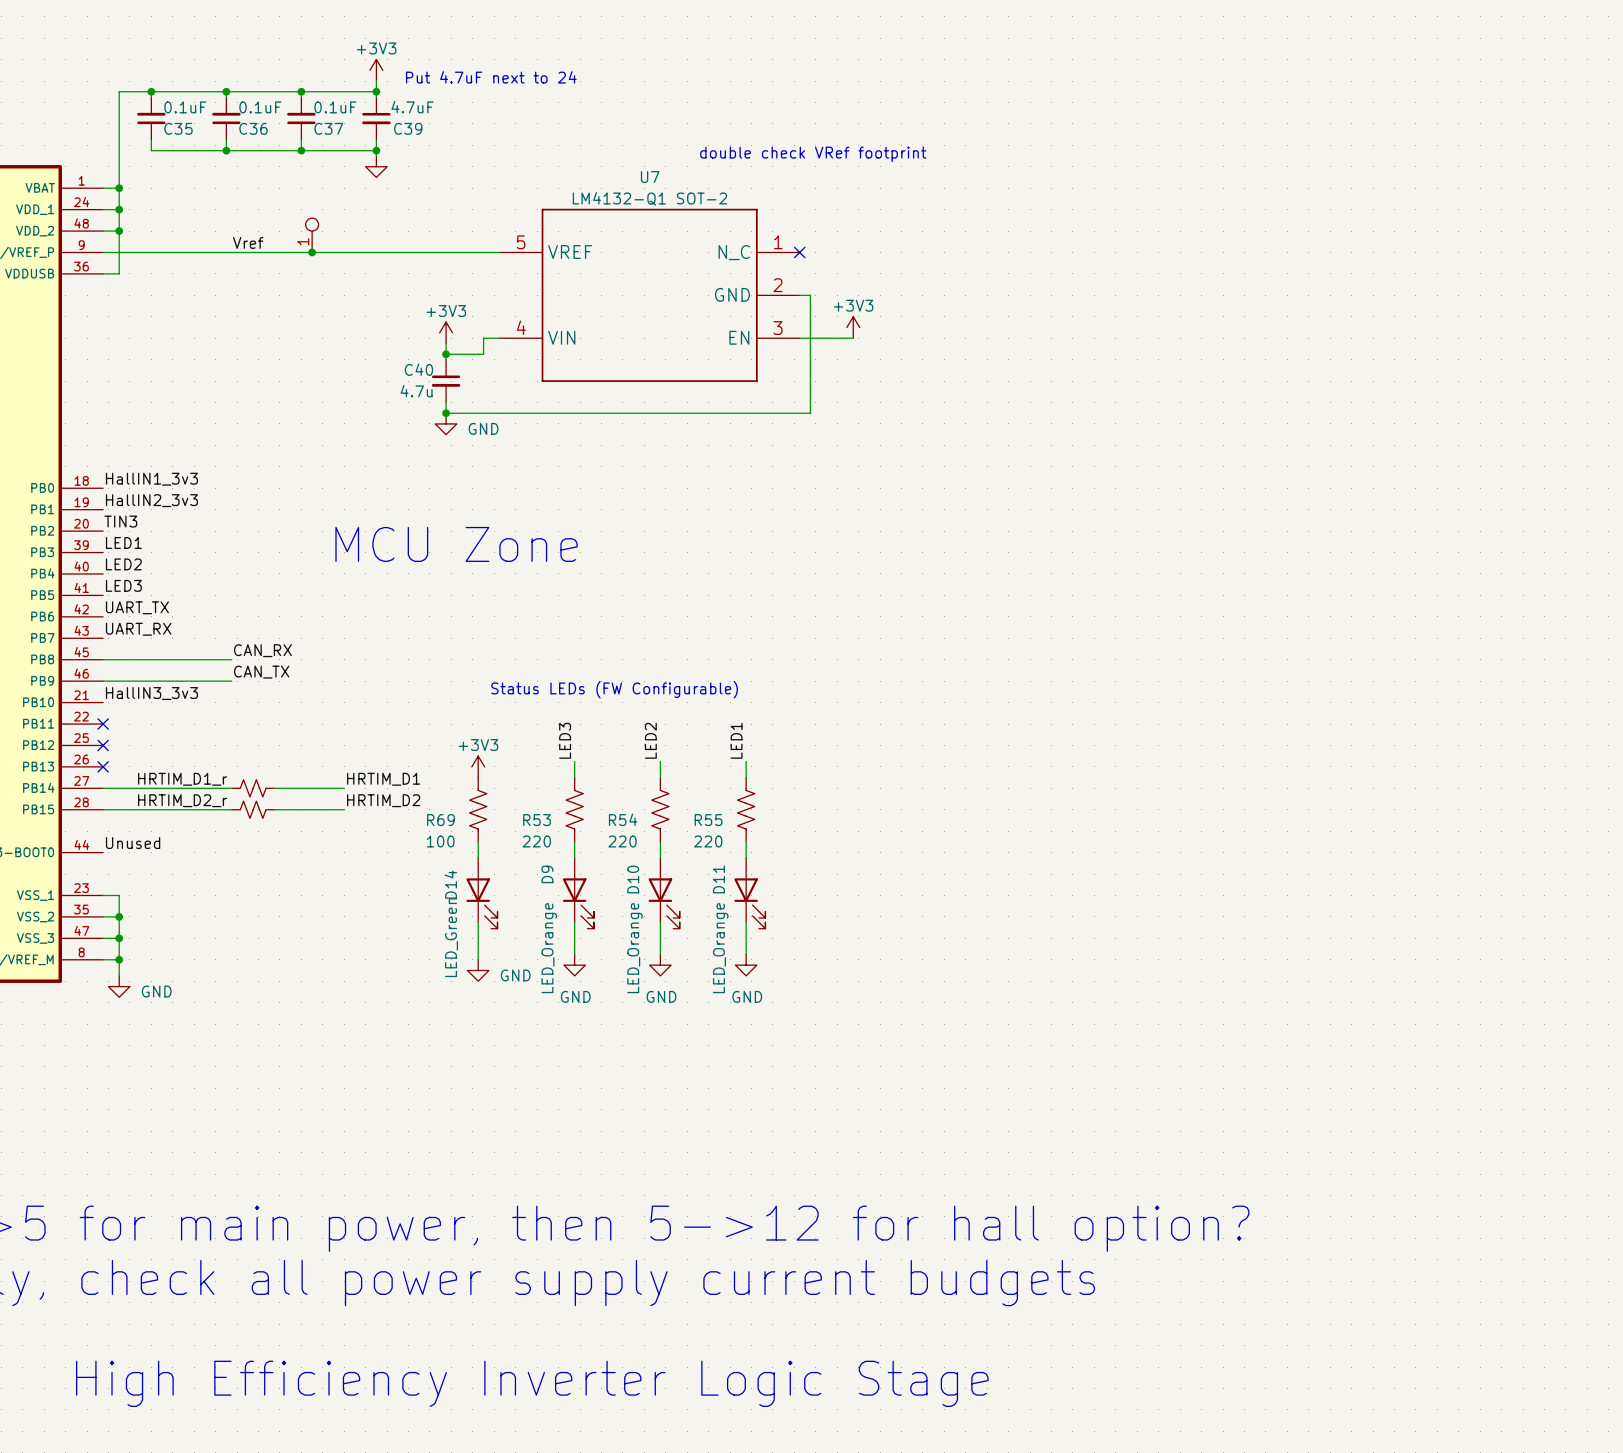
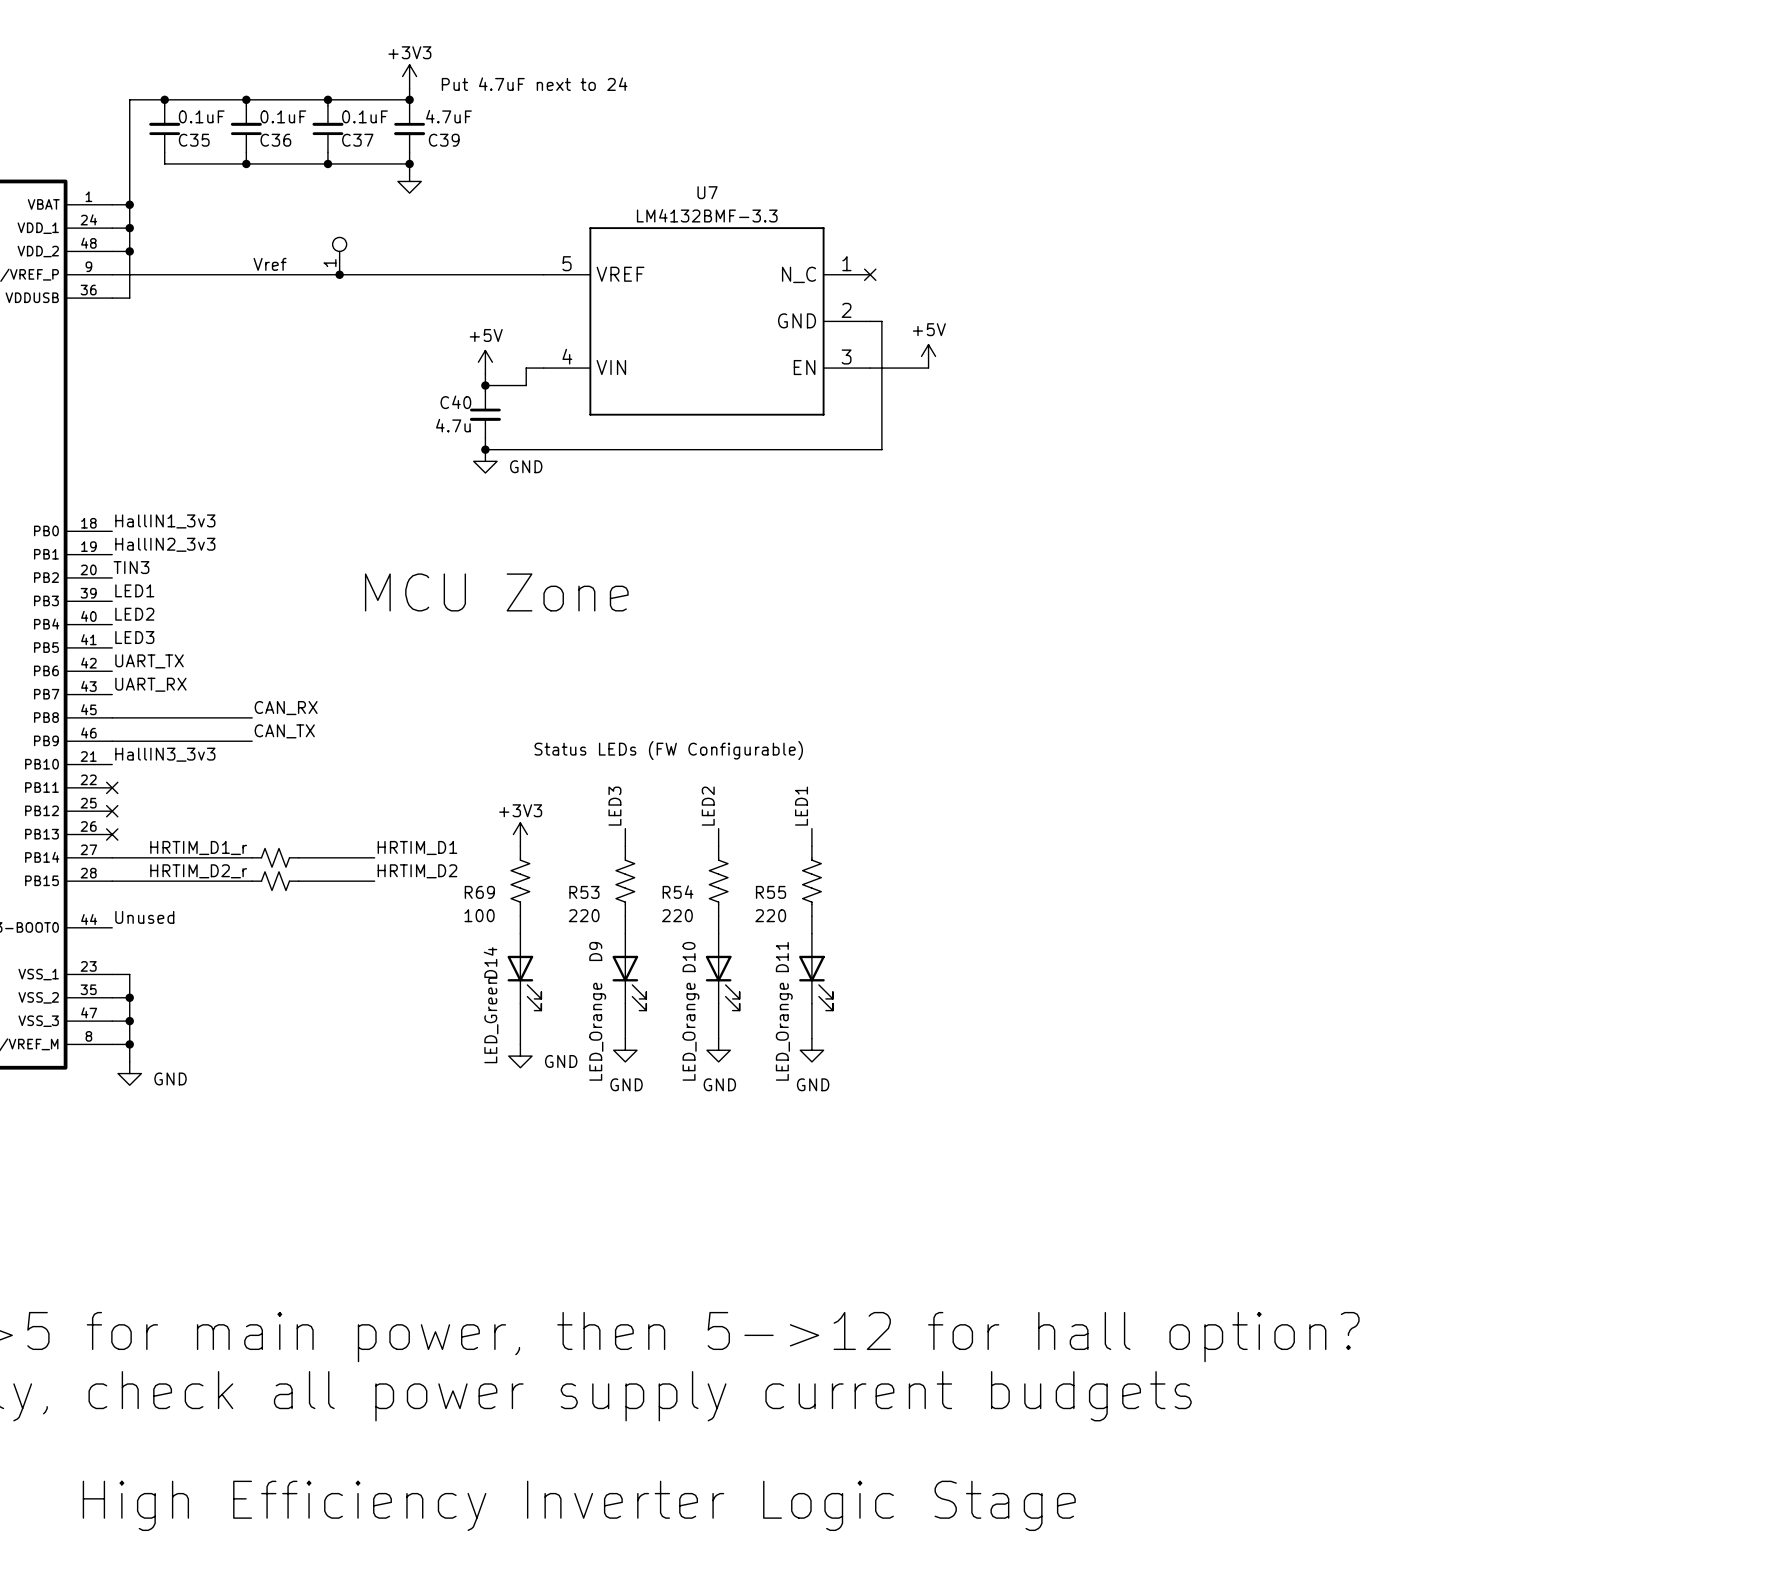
text: double check VRef footprint (813, 154) -> none
U7 value: LM4132-Q1 SOT-2 (649, 198) -> LM4132BMF-3.3 (707, 215)
power symbol: +3V3 (853, 327) -> +5V (928, 356)
power symbol: +3V3 (446, 332) -> +5V (485, 362)

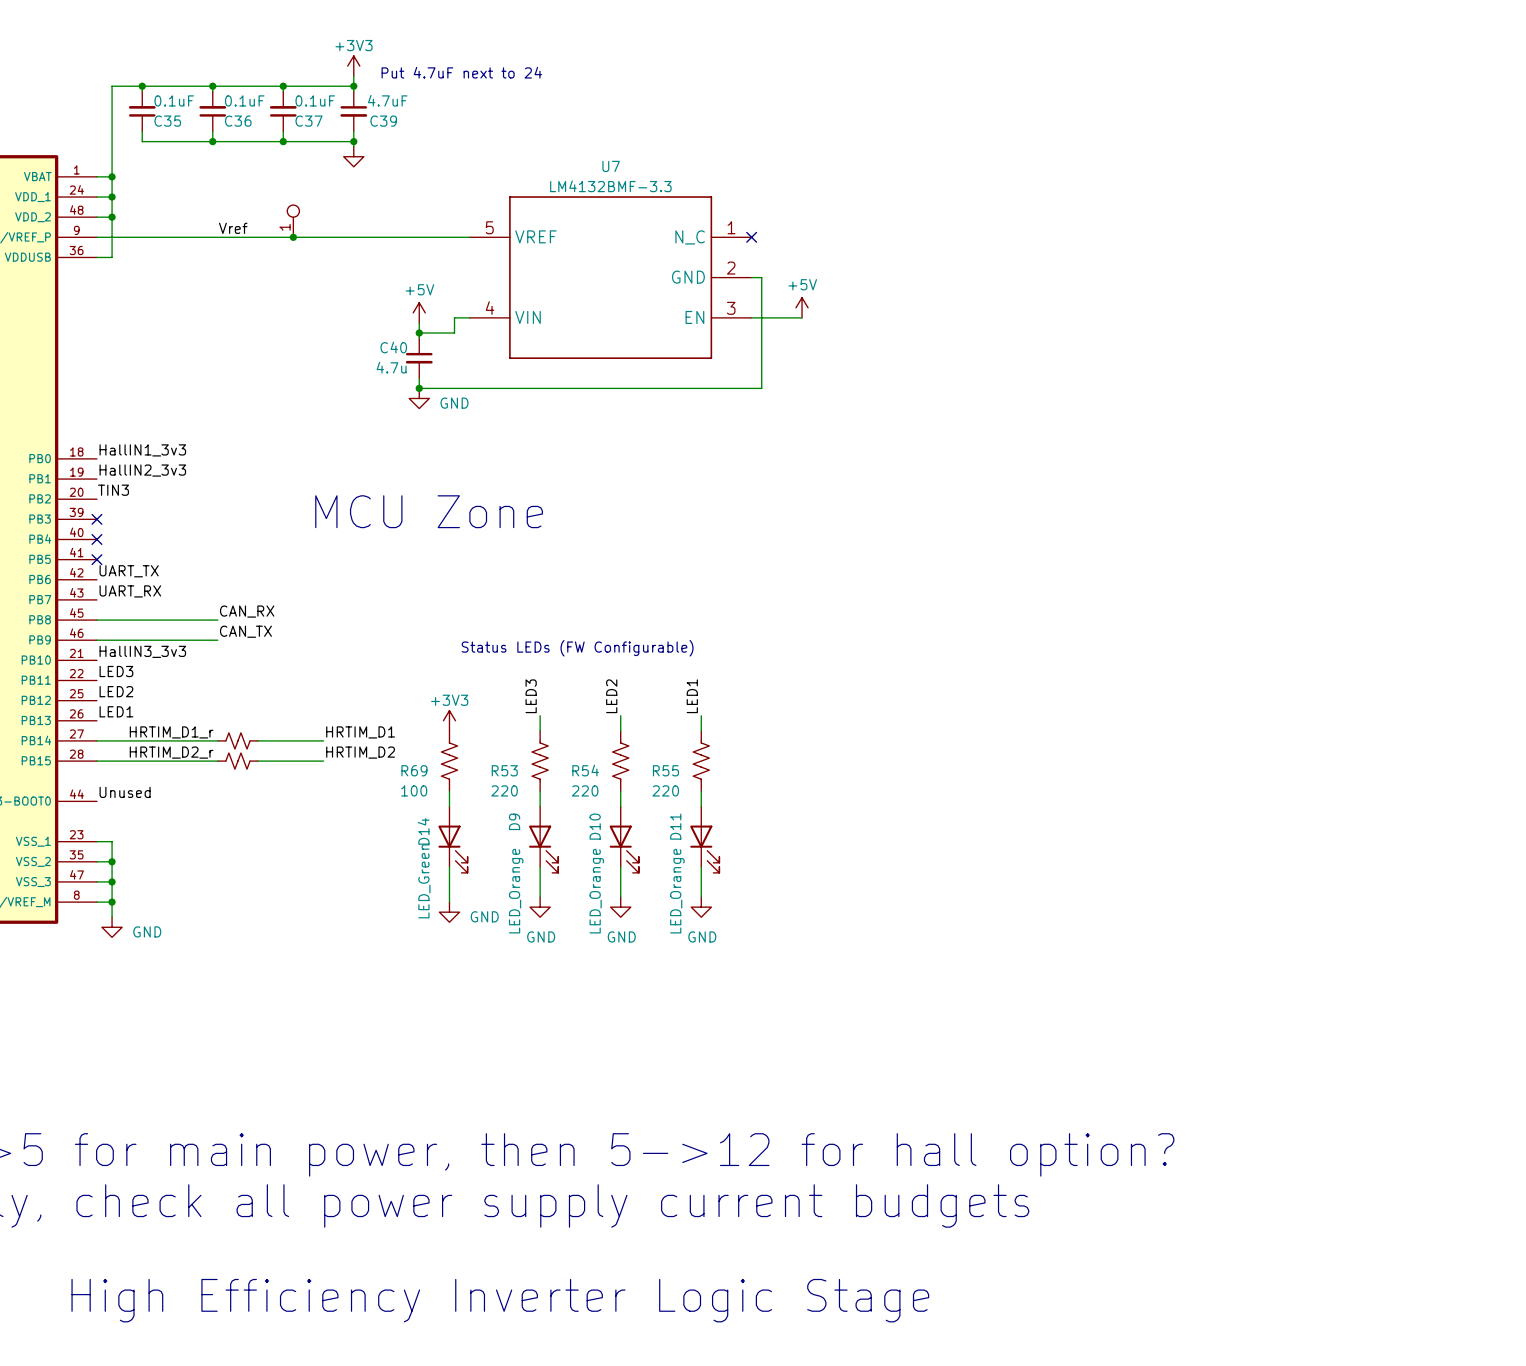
label: LED1 (134, 590) -> none
no-connect mark: none -> (96, 519)
label position: LED2 (134, 614) -> LED2 (116, 691)
no-connect mark: none -> (96, 539)
label position: LED3 (134, 637) -> LED3 (116, 671)
no-connect mark: none -> (96, 559)
no-connect mark: (112, 787) -> none
no-connect mark: (112, 811) -> none
label: none -> LED1 (116, 711)
no-connect mark: (112, 834) -> none

